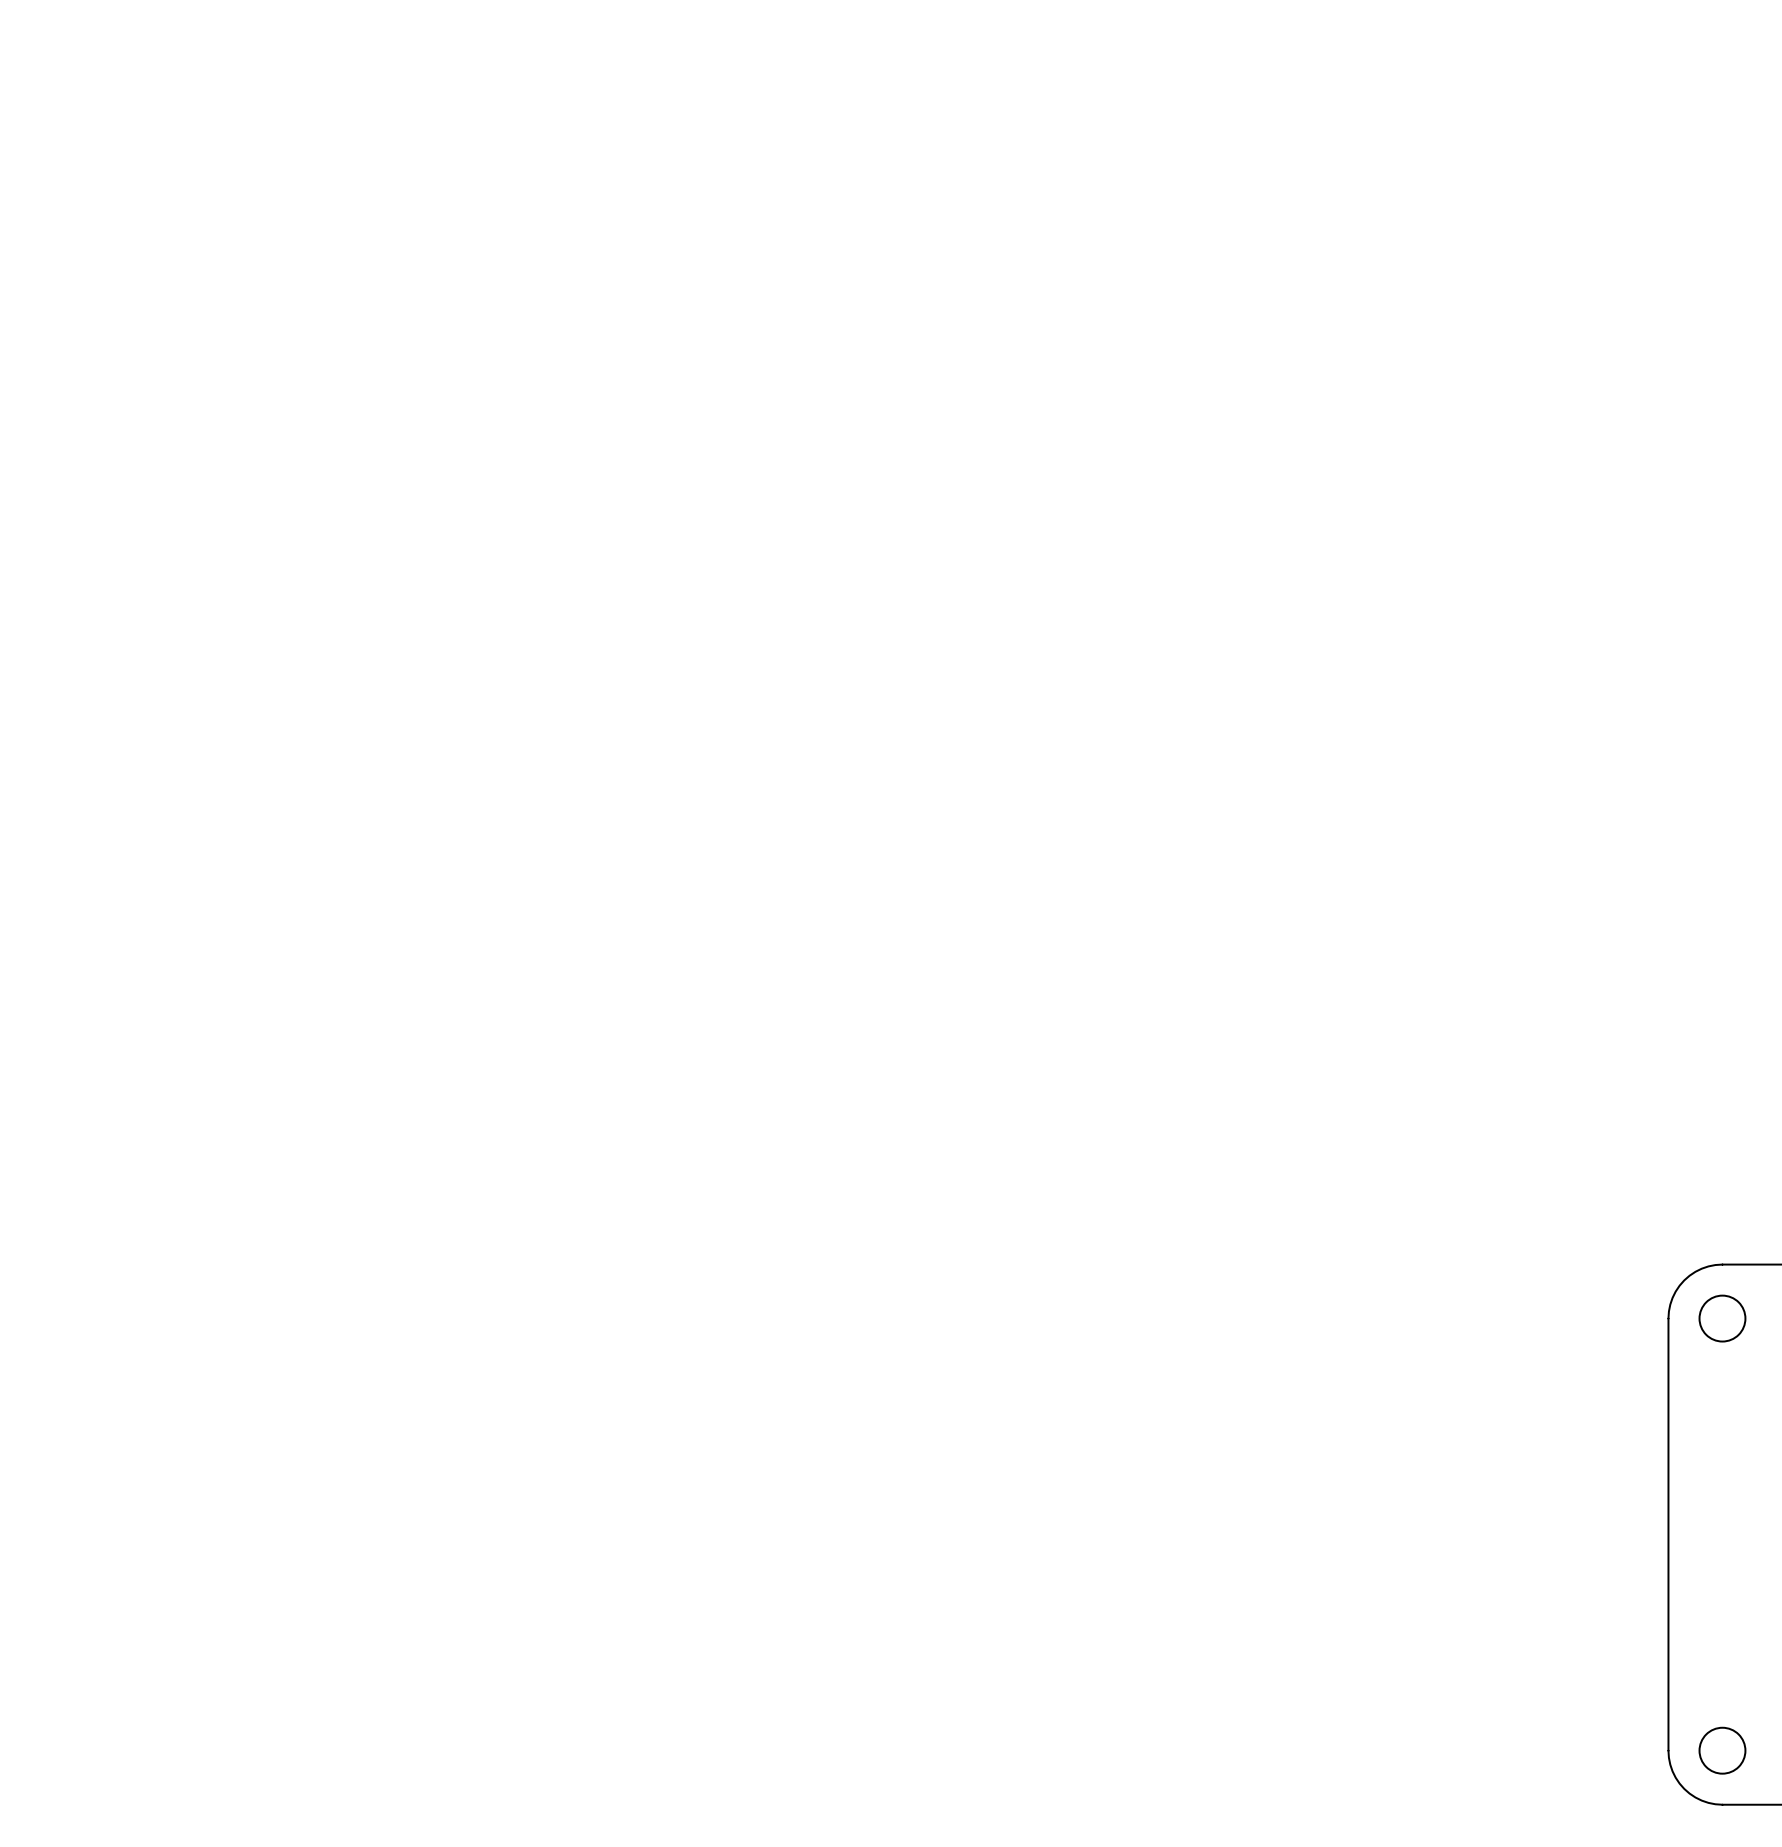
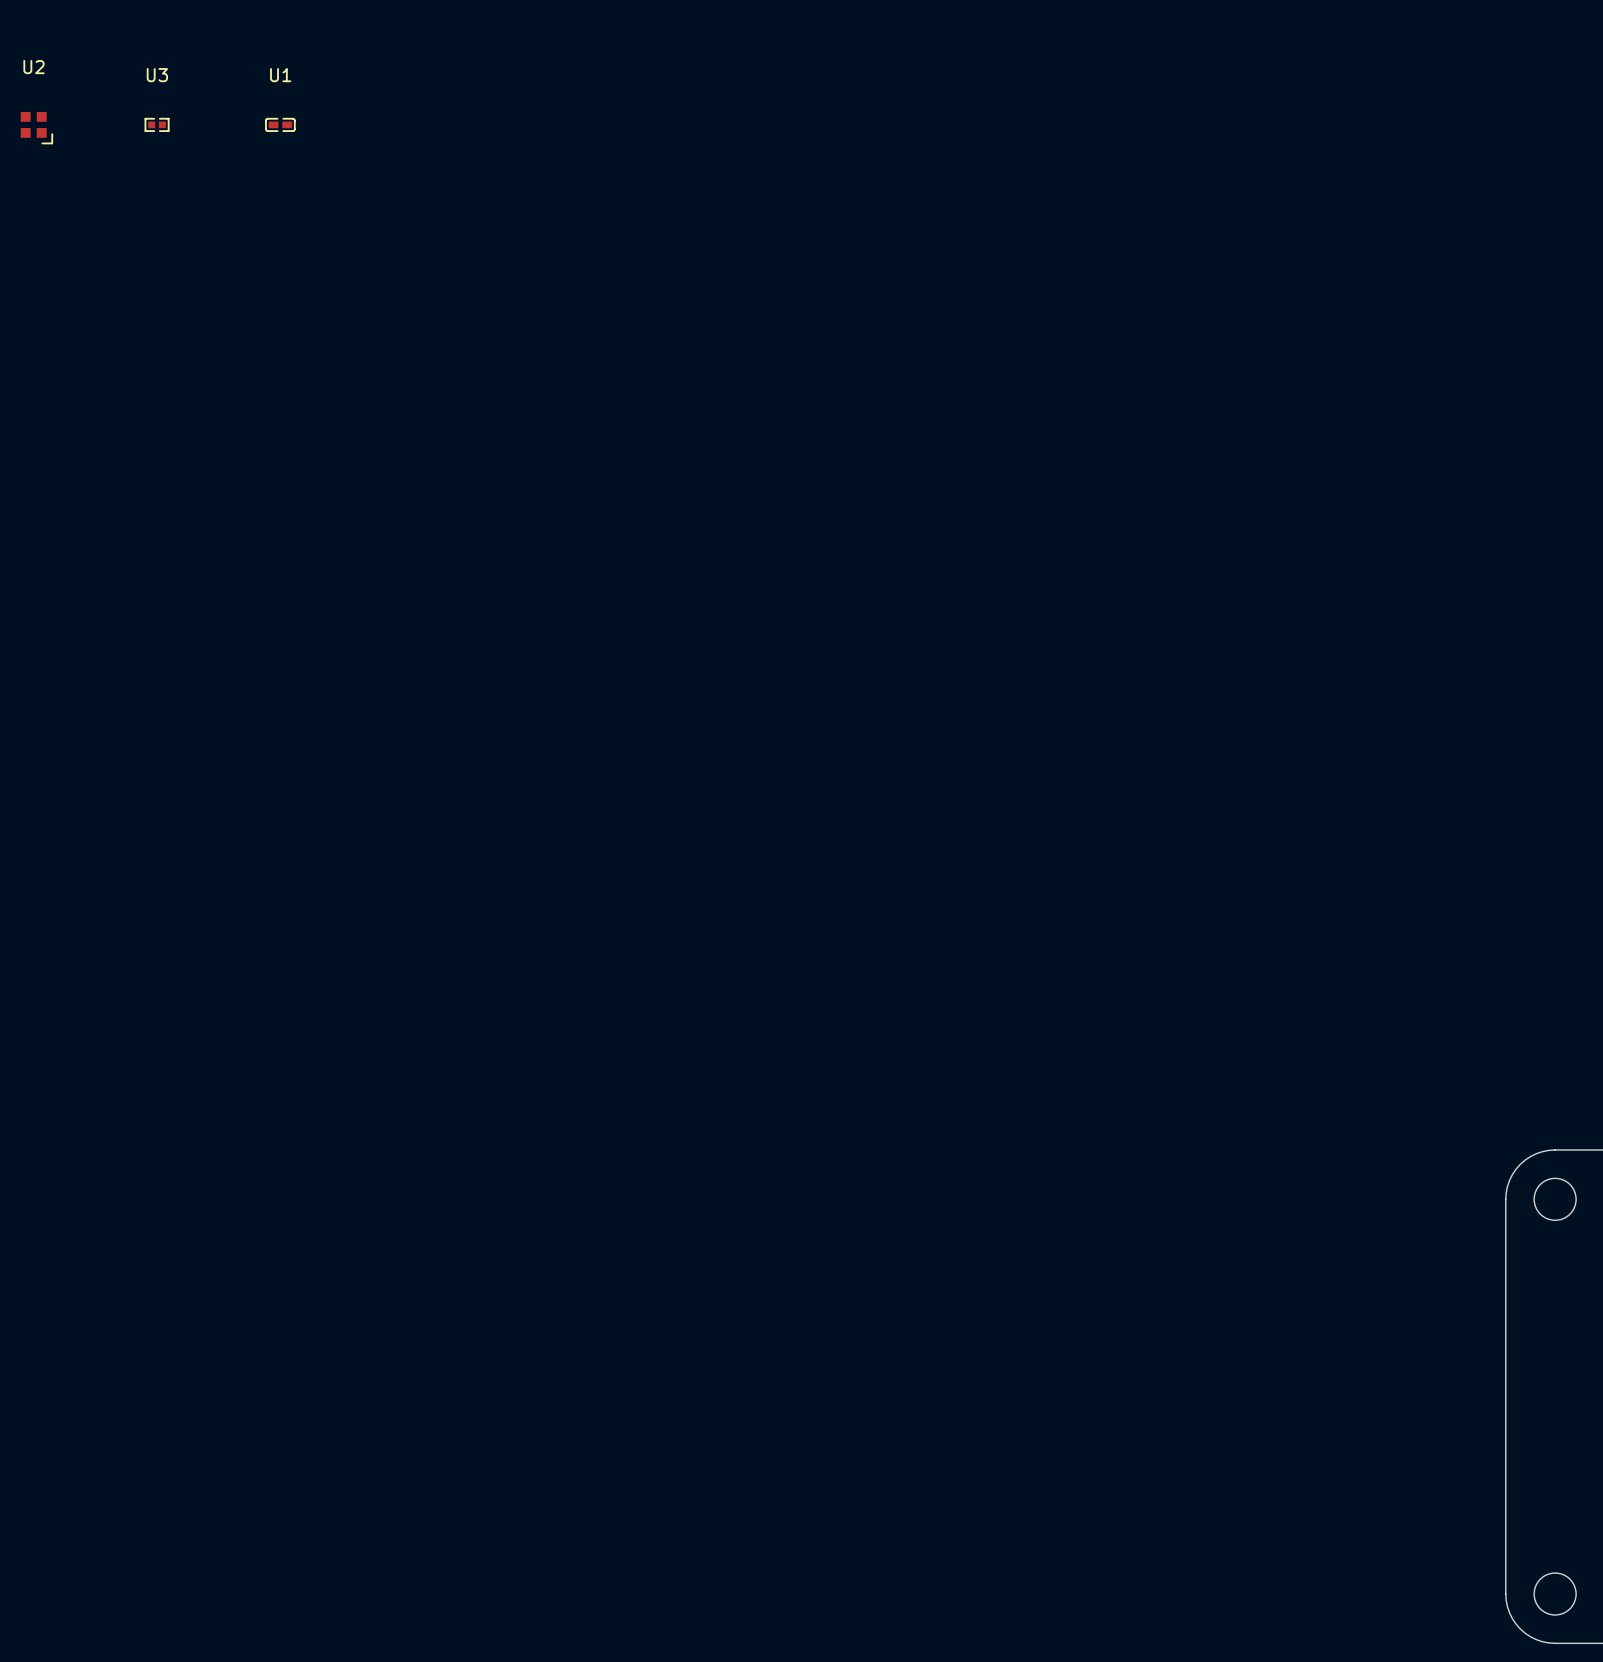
U3: none -> (157, 124)
U1: none -> (280, 124)
U2: none -> (36, 128)

